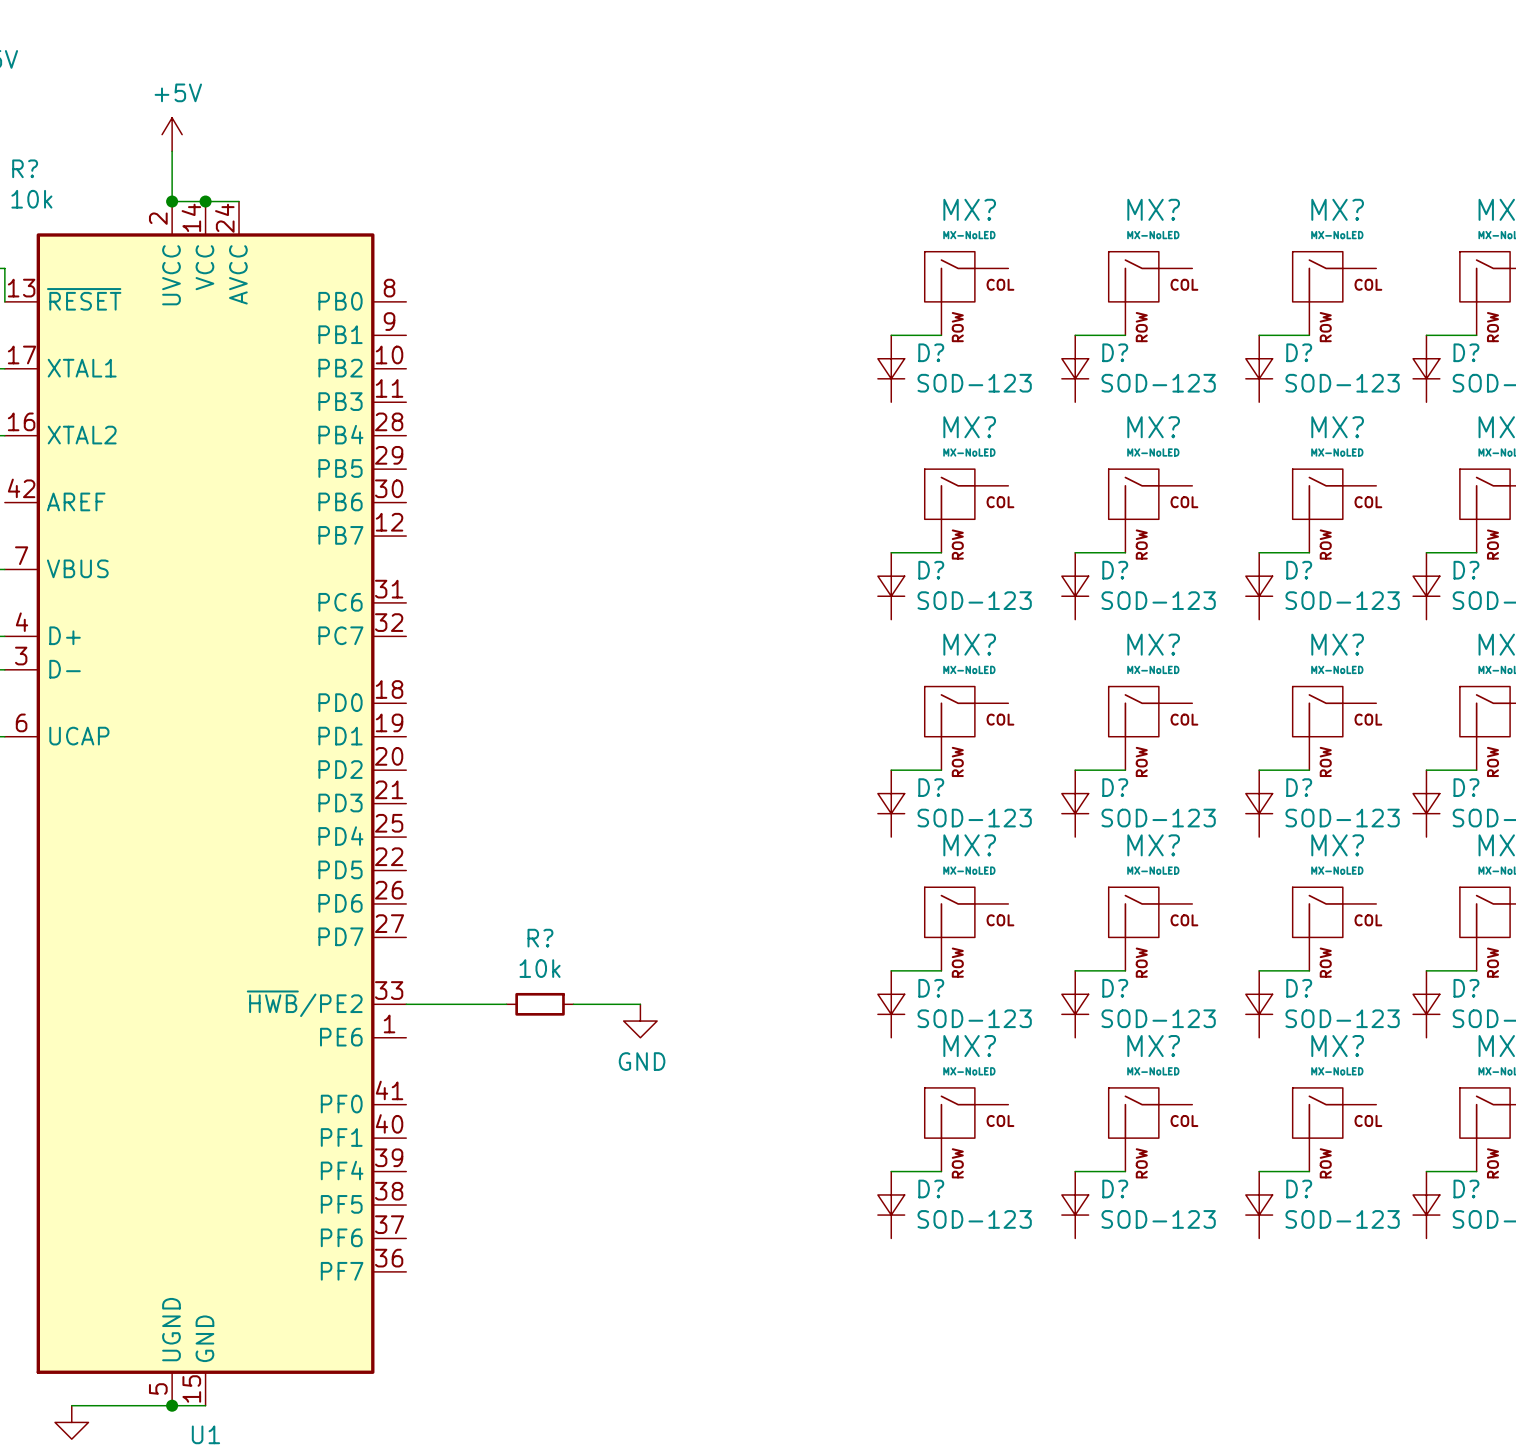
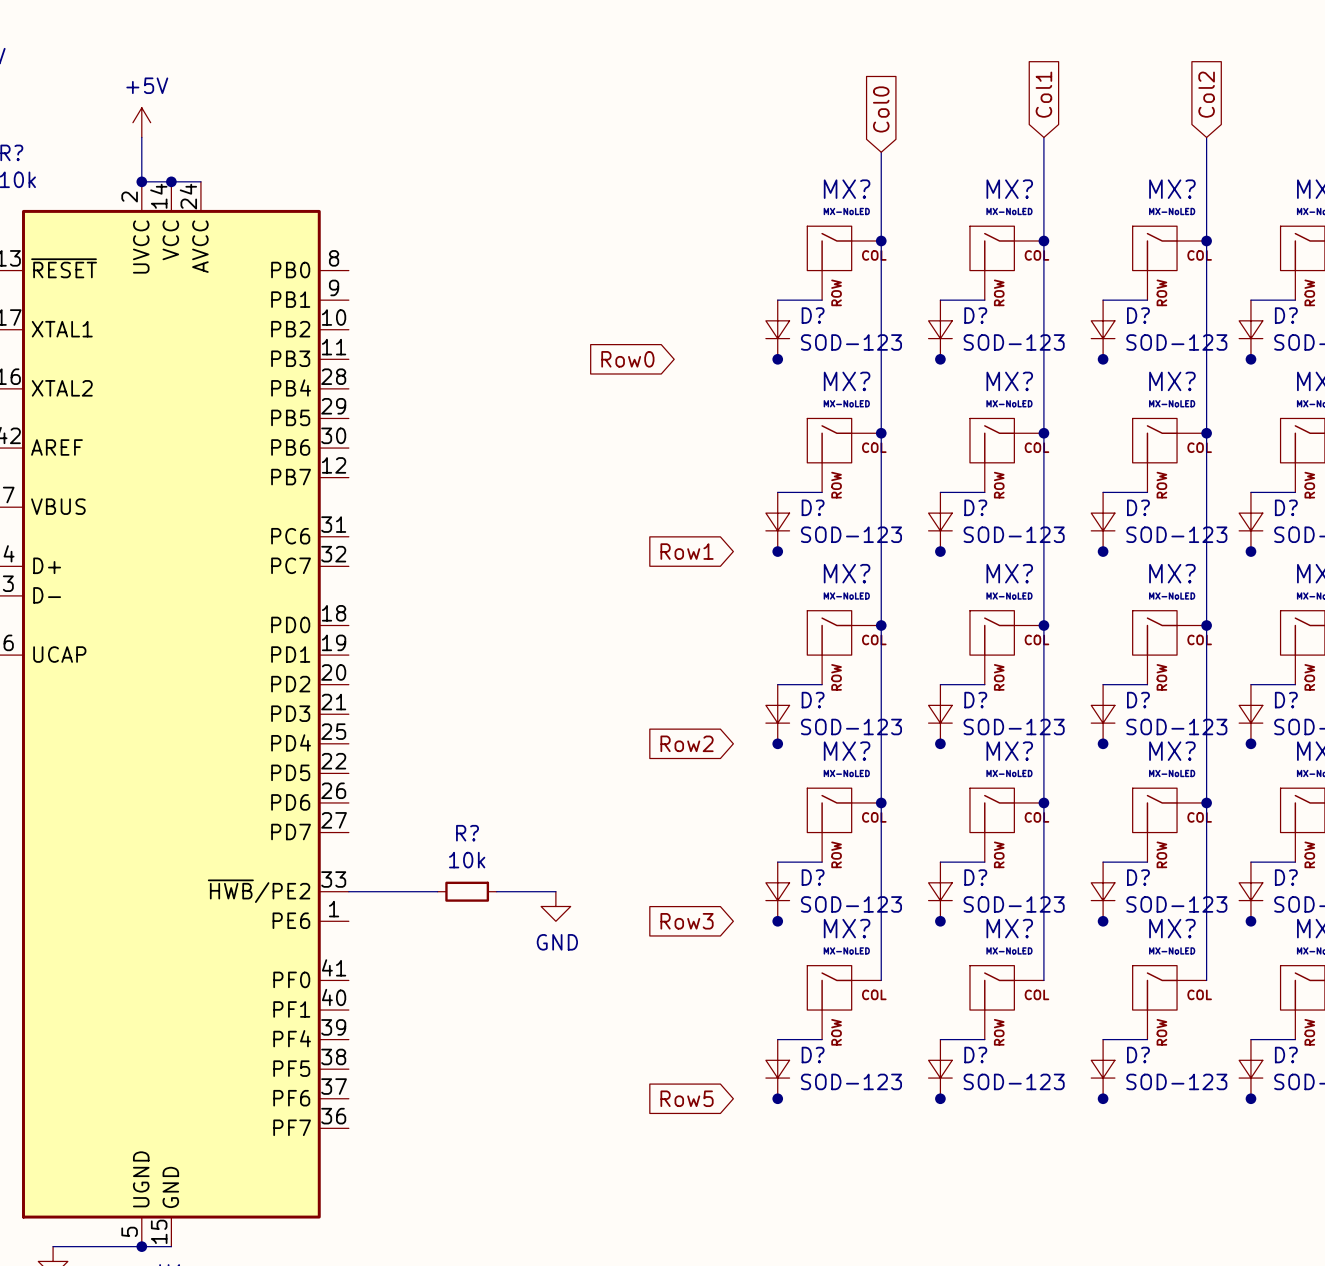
global label: none -> Col1 (1043, 94)
global label: none -> Col2 (1206, 94)
global label: none -> Col0 (881, 109)
wire: none -> (1043, 137) (1043, 980)
wire: none -> (1206, 137) (1206, 980)
wire: none -> (881, 152) (881, 980)
junction: none -> (881, 240)
junction: none -> (1043, 240)
junction: none -> (1206, 240)
global label: none -> Row0 (627, 359)
junction: none -> (777, 359)
junction: none -> (940, 359)
junction: none -> (1103, 359)
junction: none -> (1250, 359)
junction: none -> (881, 433)
junction: none -> (1043, 433)
junction: none -> (1206, 433)
global label: none -> Row1 (687, 551)
junction: none -> (777, 551)
junction: none -> (940, 551)
junction: none -> (1103, 551)
junction: none -> (1250, 551)
junction: none -> (881, 625)
junction: none -> (1043, 625)
junction: none -> (1206, 625)
global label: none -> Row2 (687, 743)
junction: none -> (777, 743)
junction: none -> (940, 743)
junction: none -> (1103, 743)
junction: none -> (1250, 743)
junction: none -> (881, 802)
junction: none -> (1043, 802)
junction: none -> (1206, 802)
global label: none -> Row3 (687, 921)
junction: none -> (777, 921)
junction: none -> (940, 921)
junction: none -> (1103, 921)
junction: none -> (1250, 921)
global label: none -> Row5 (687, 1098)
junction: none -> (777, 1098)
junction: none -> (940, 1098)
junction: none -> (1103, 1098)
junction: none -> (1250, 1098)

